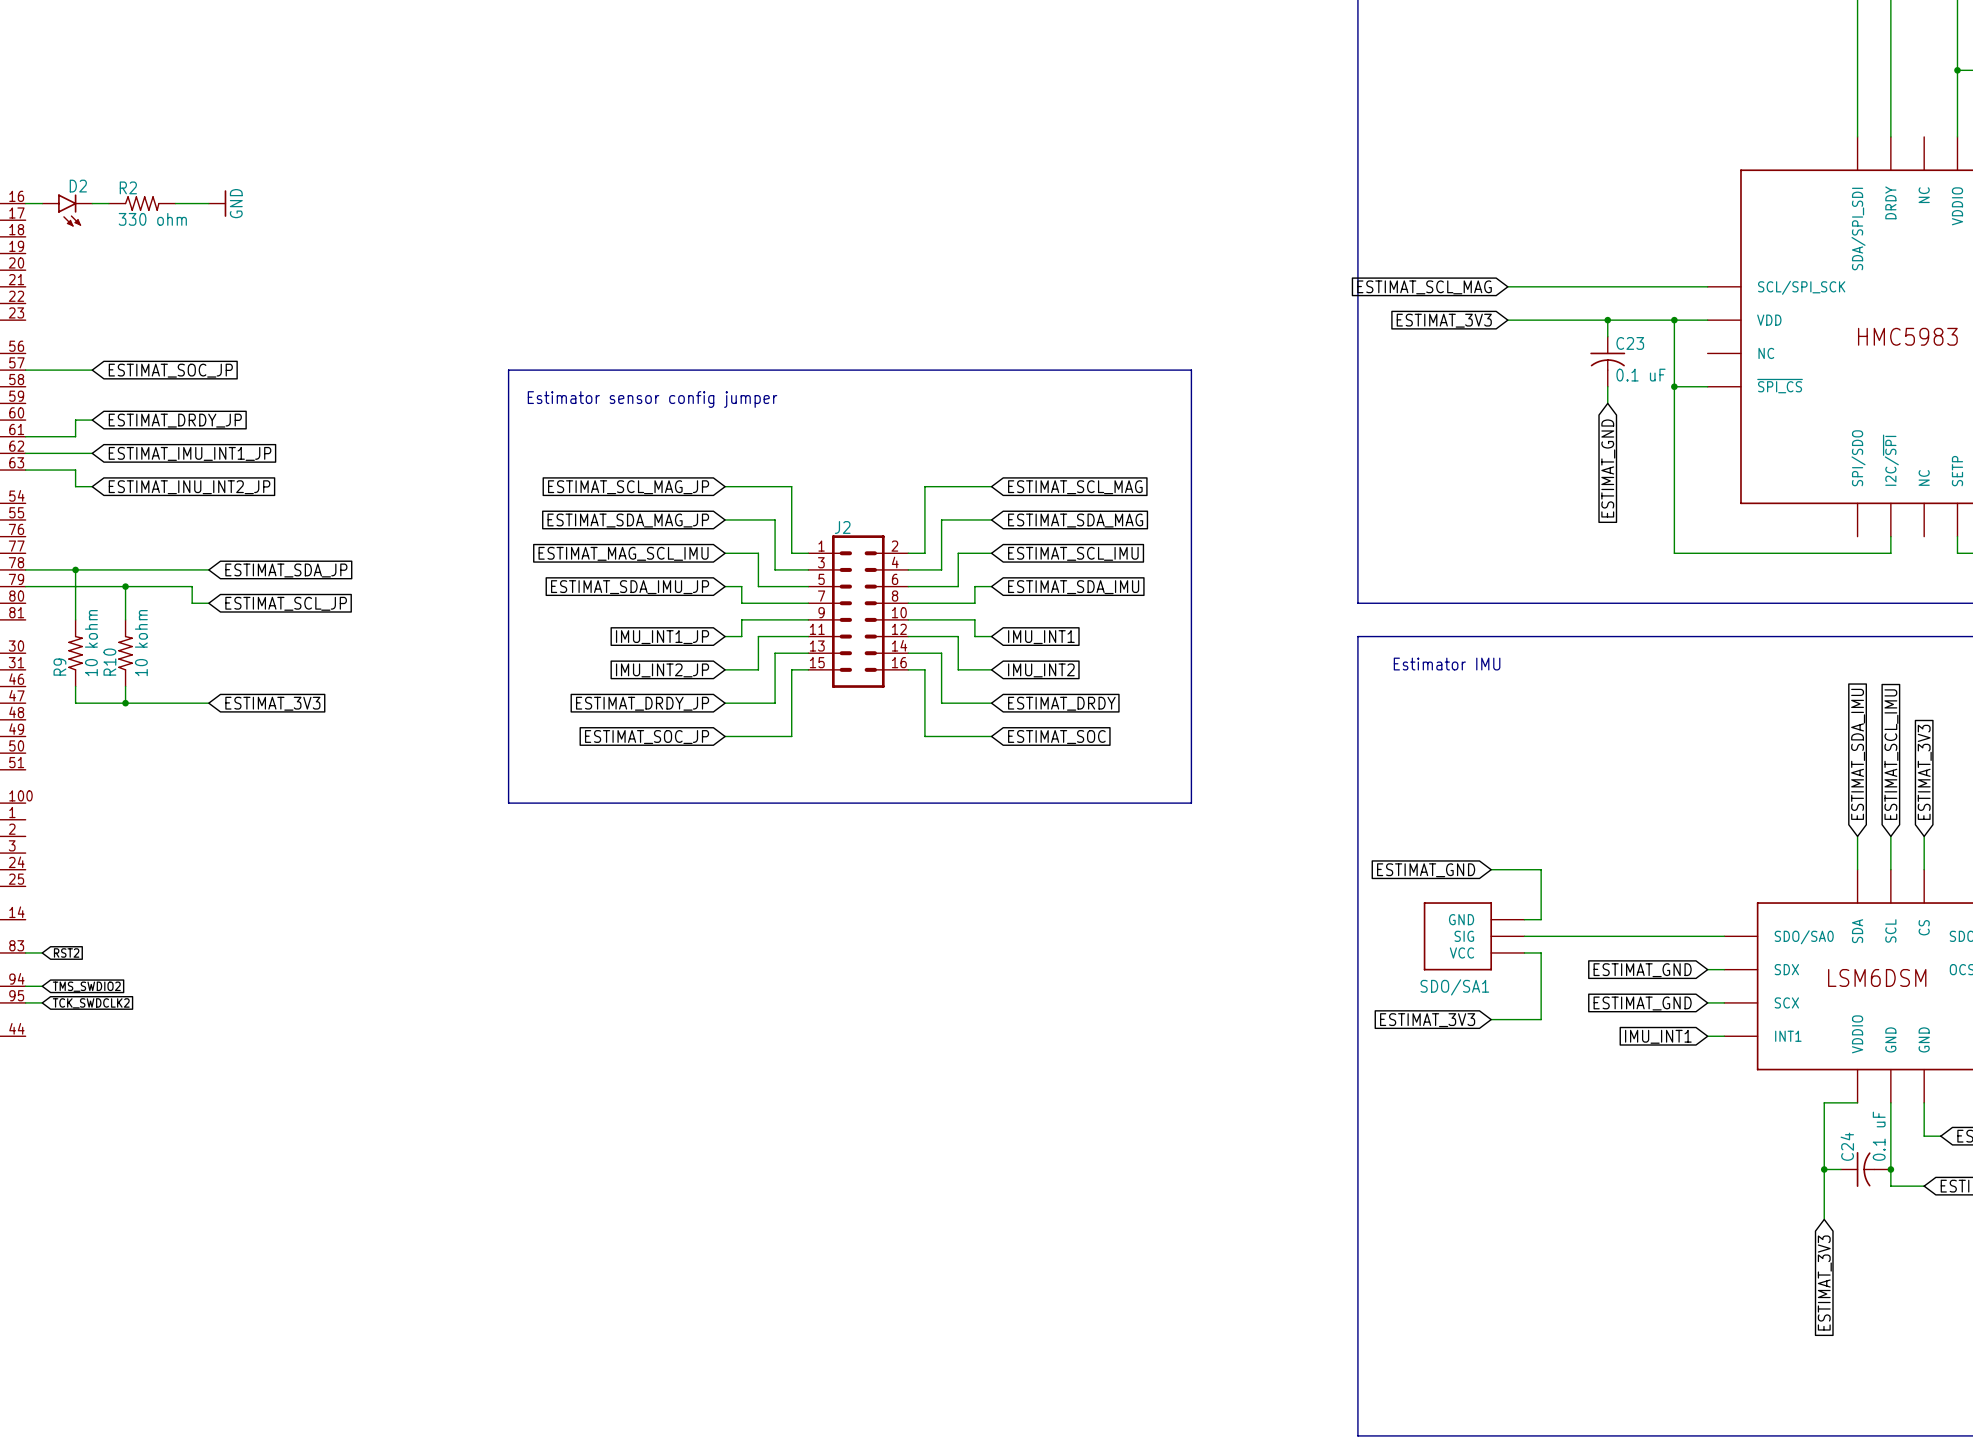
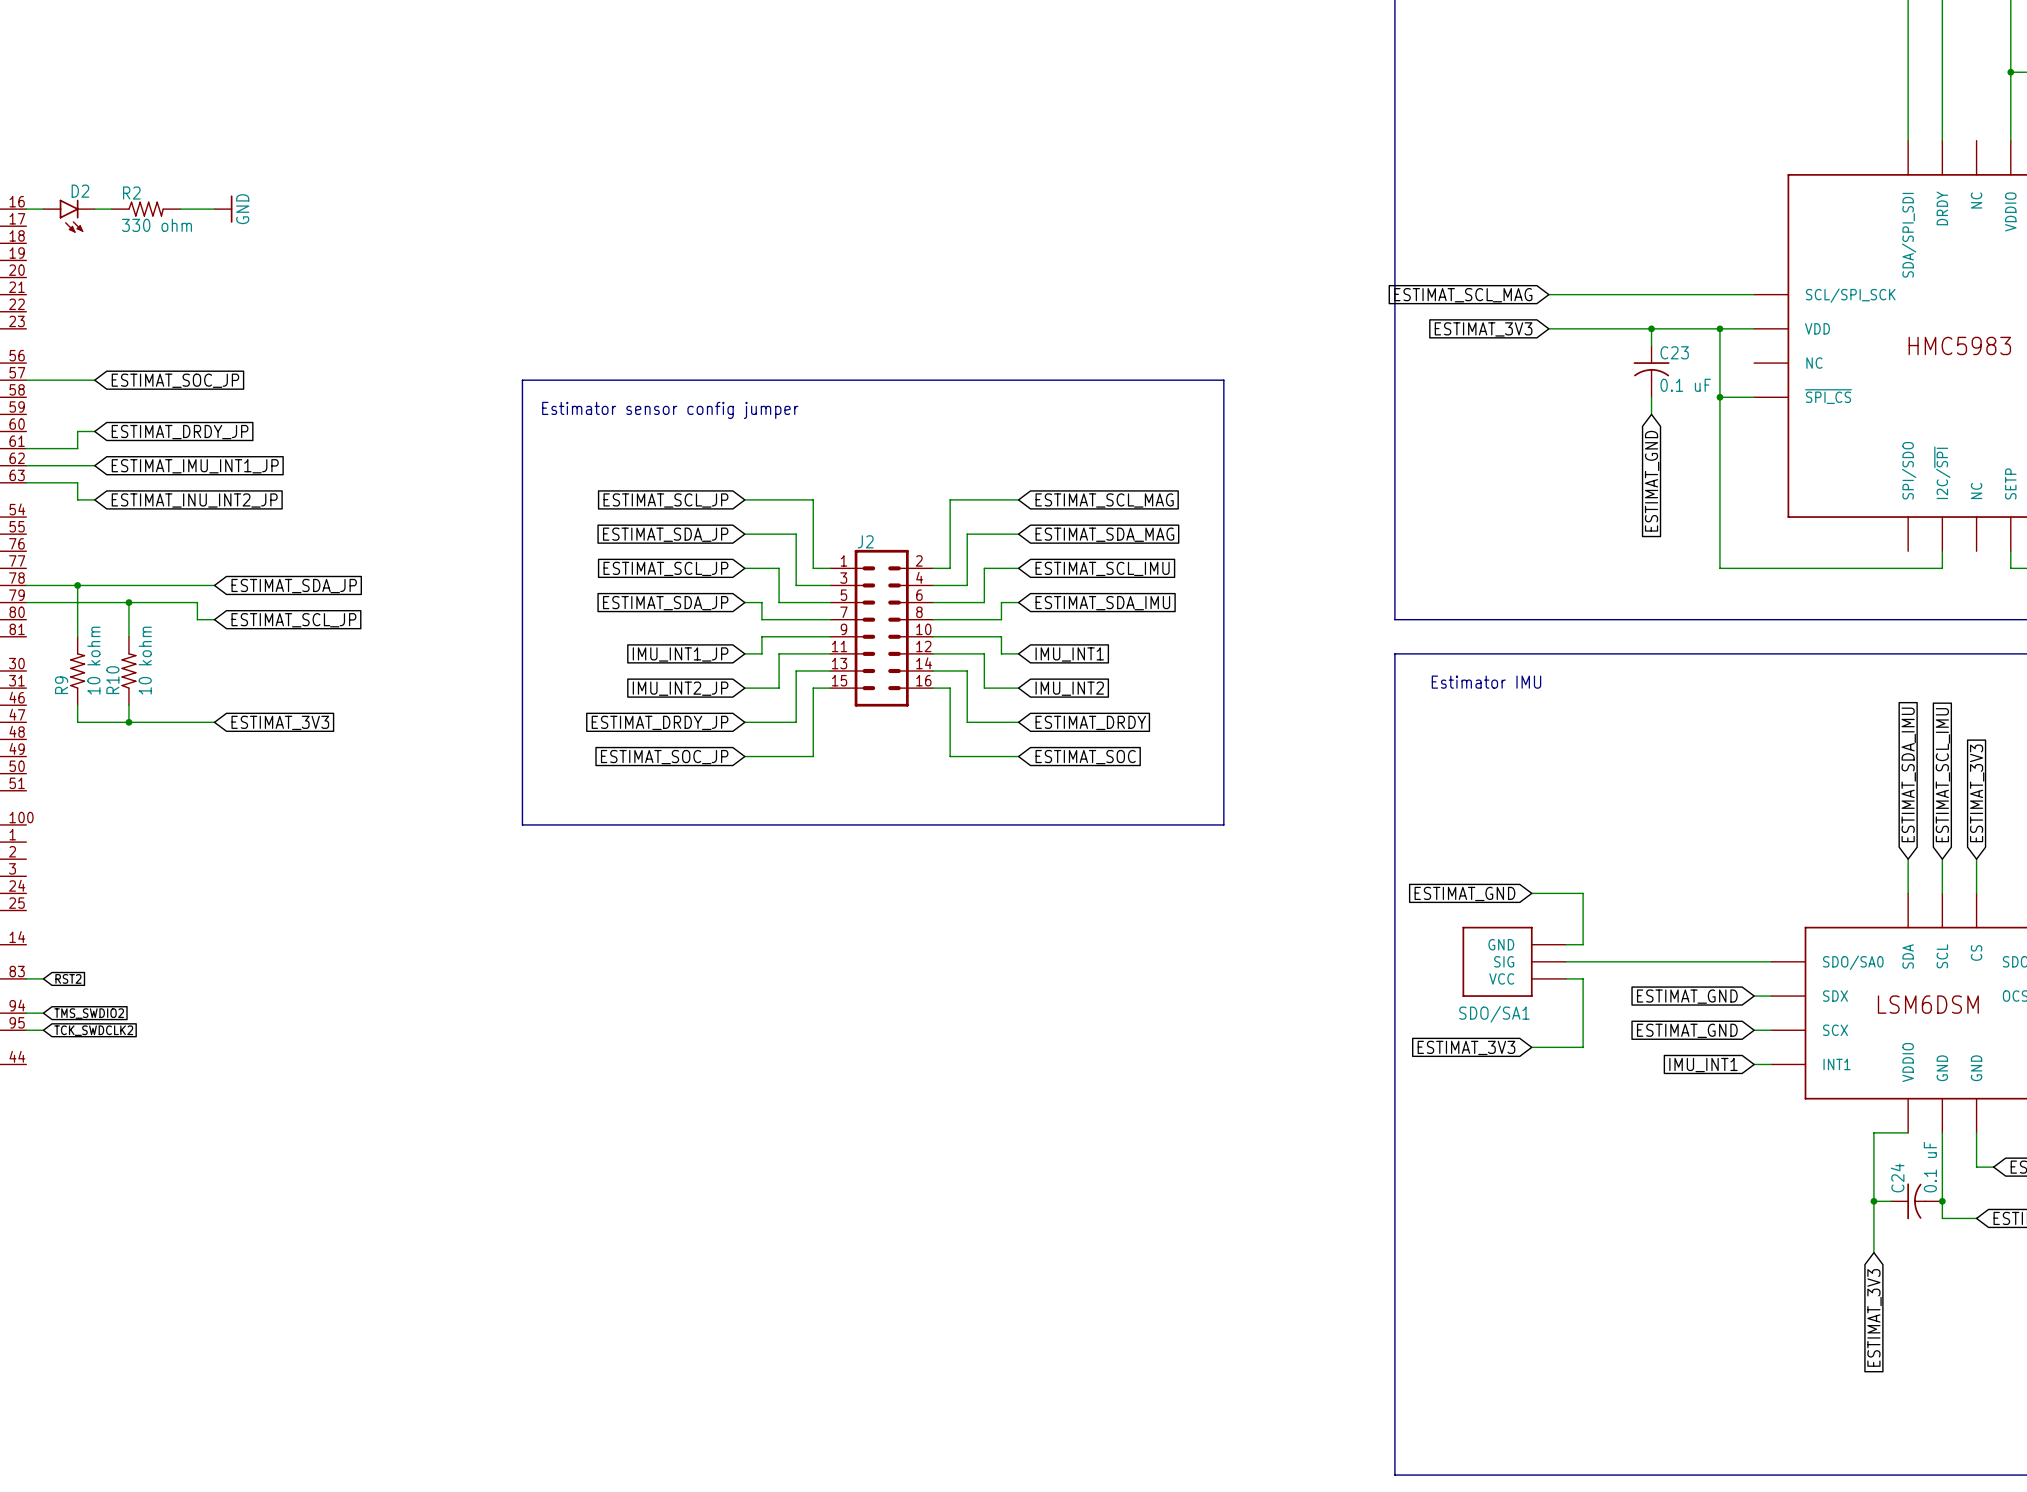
global label: ESTIMAT_SCL_MAG_JP (628, 487) -> ESTIMAT_SCL_JP (665, 500)
global label: ESTIMAT_SDA_MAG_JP (628, 520) -> ESTIMAT_SDA_JP (665, 534)
global label: ESTIMAT_MAG_SCL_IMU (623, 553) -> ESTIMAT_SCL_JP (665, 568)
global label: ESTIMAT_SDA_IMU_JP (630, 587) -> ESTIMAT_SDA_JP (665, 603)

